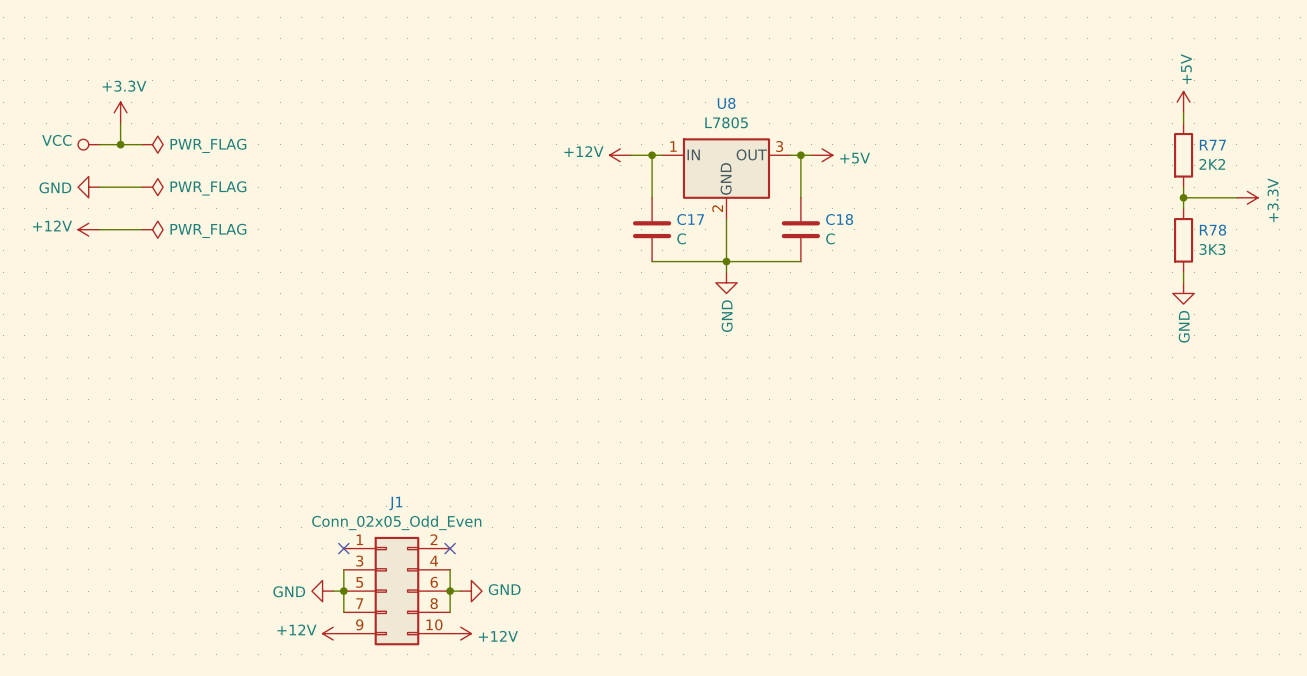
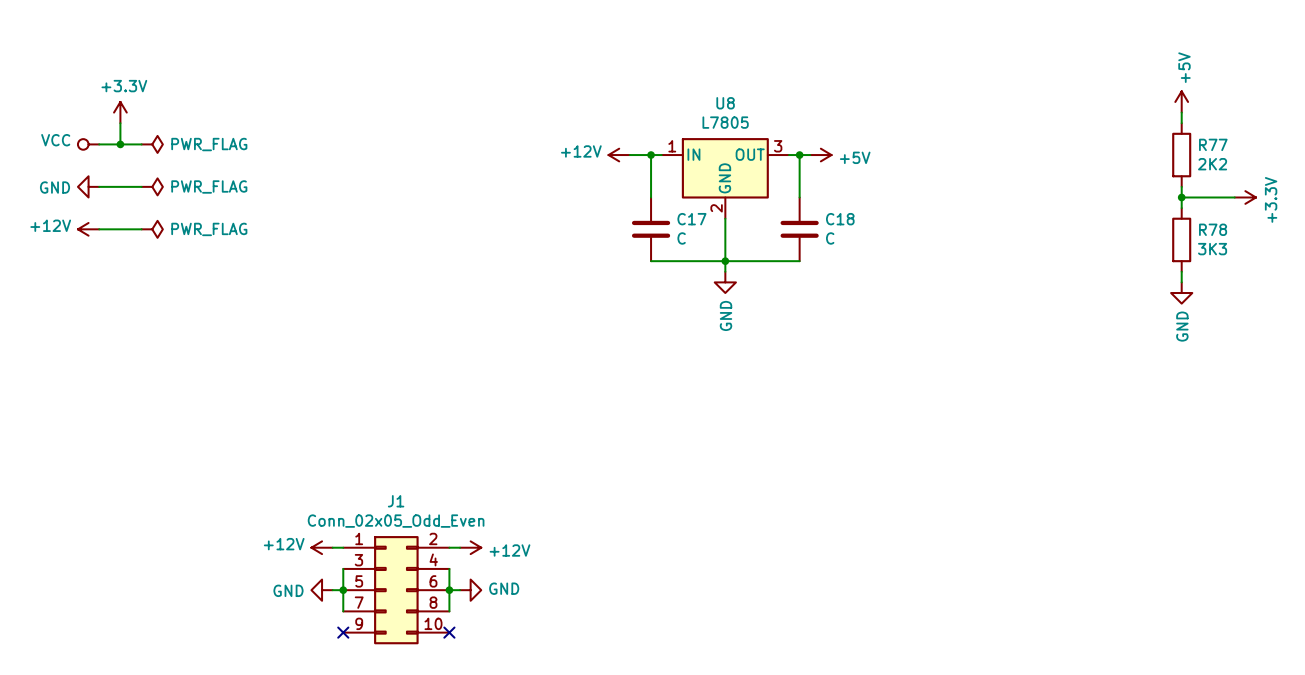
power symbol: none -> +12V (322, 547)
wire: none -> (332, 547) (343, 547)
no-connect mark: (343, 548) -> none
wire: none -> (449, 547) (460, 547)
no-connect mark: (450, 548) -> none
power symbol: none -> +12V (470, 547)
power symbol: +12V (333, 633) -> none
no-connect mark: none -> (343, 632)
no-connect mark: none -> (449, 632)
power symbol: +12V (460, 633) -> none

